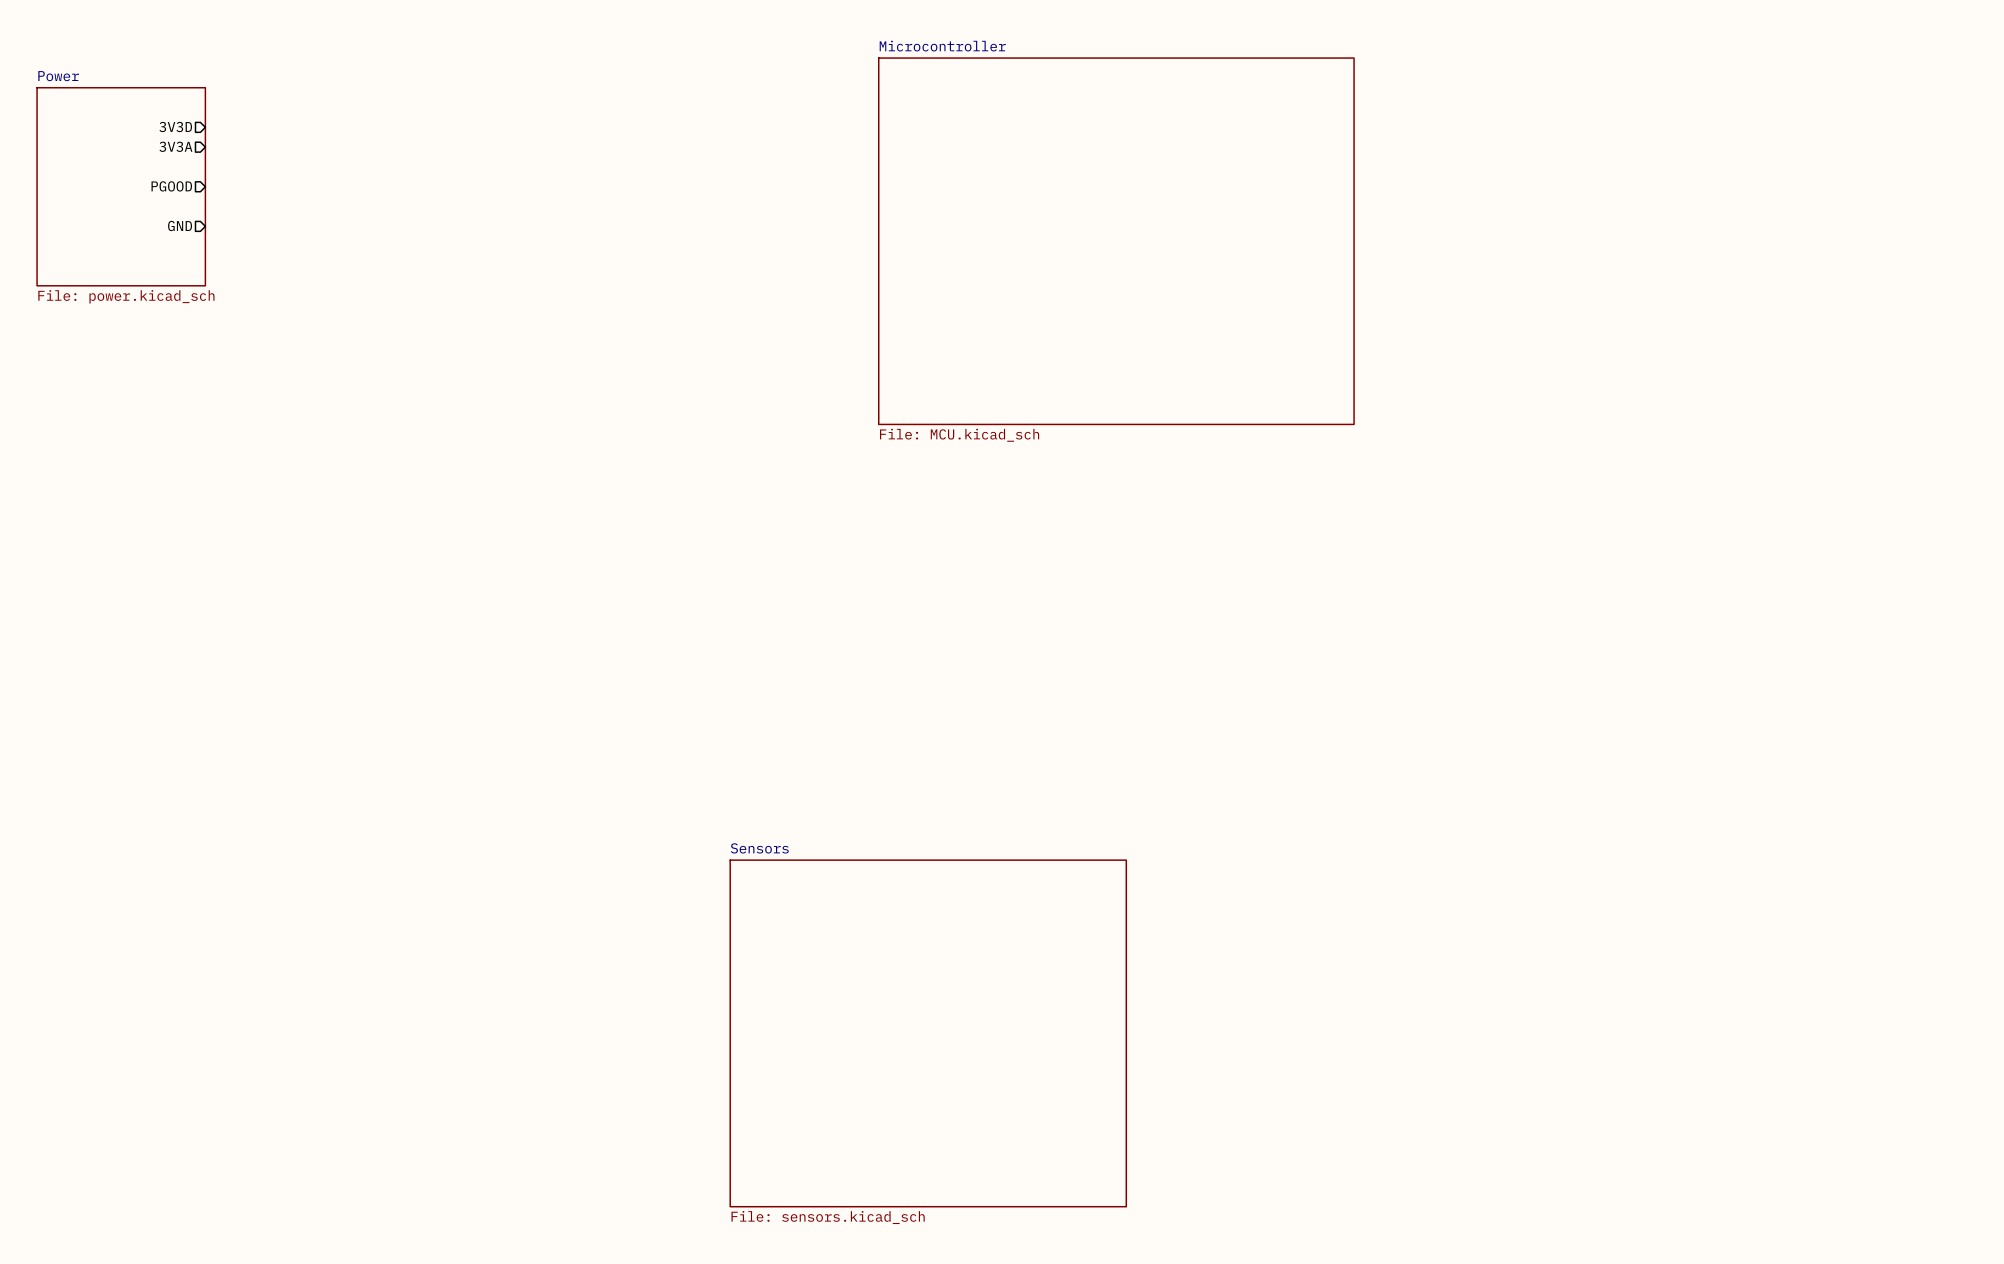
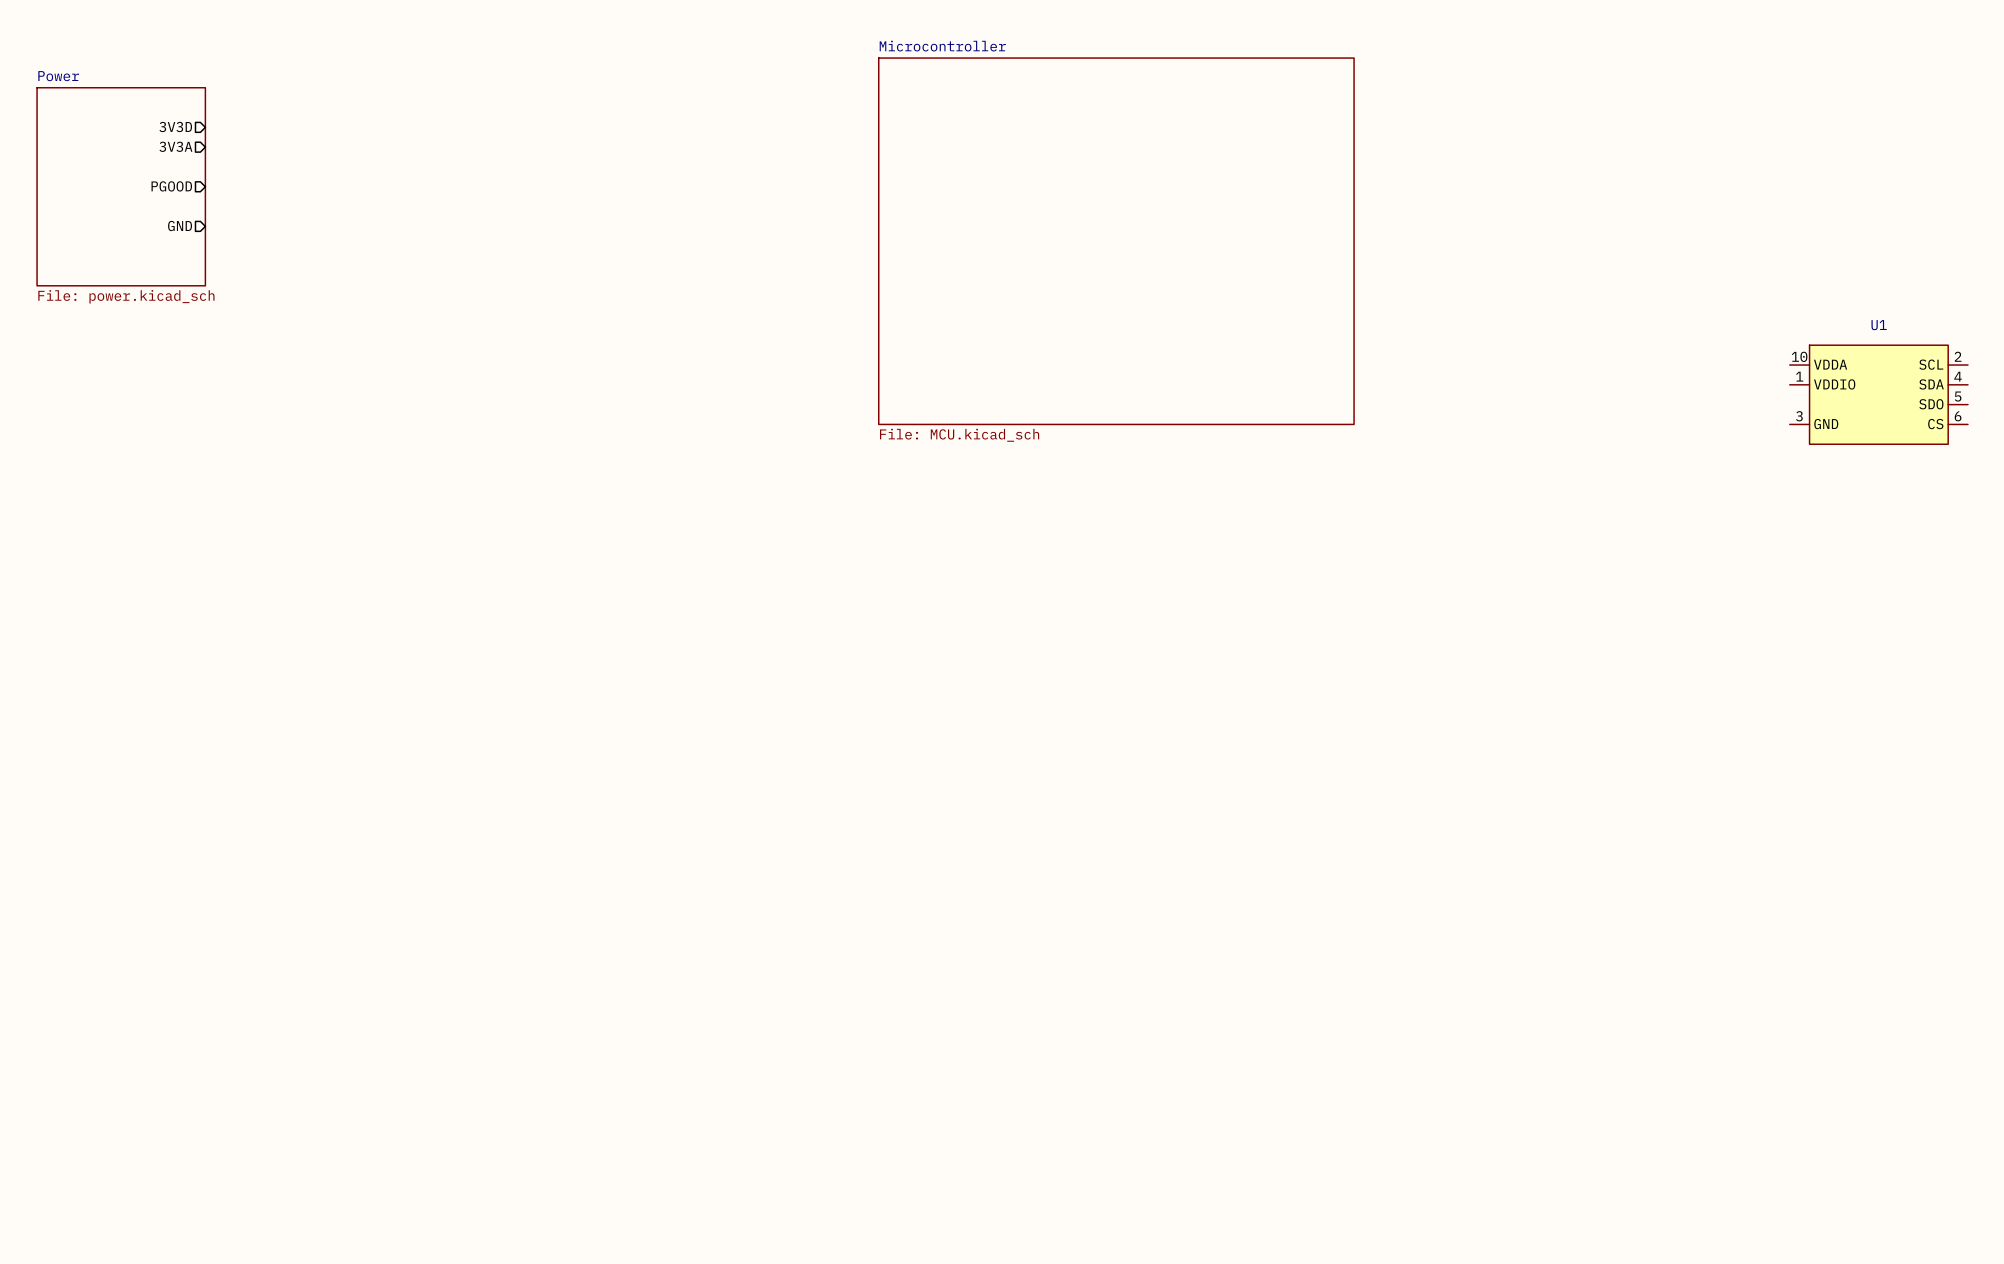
U1: none -> (1878, 394)
sheet Sensors: File: sensors.kicad_sch (928, 1033) -> none

